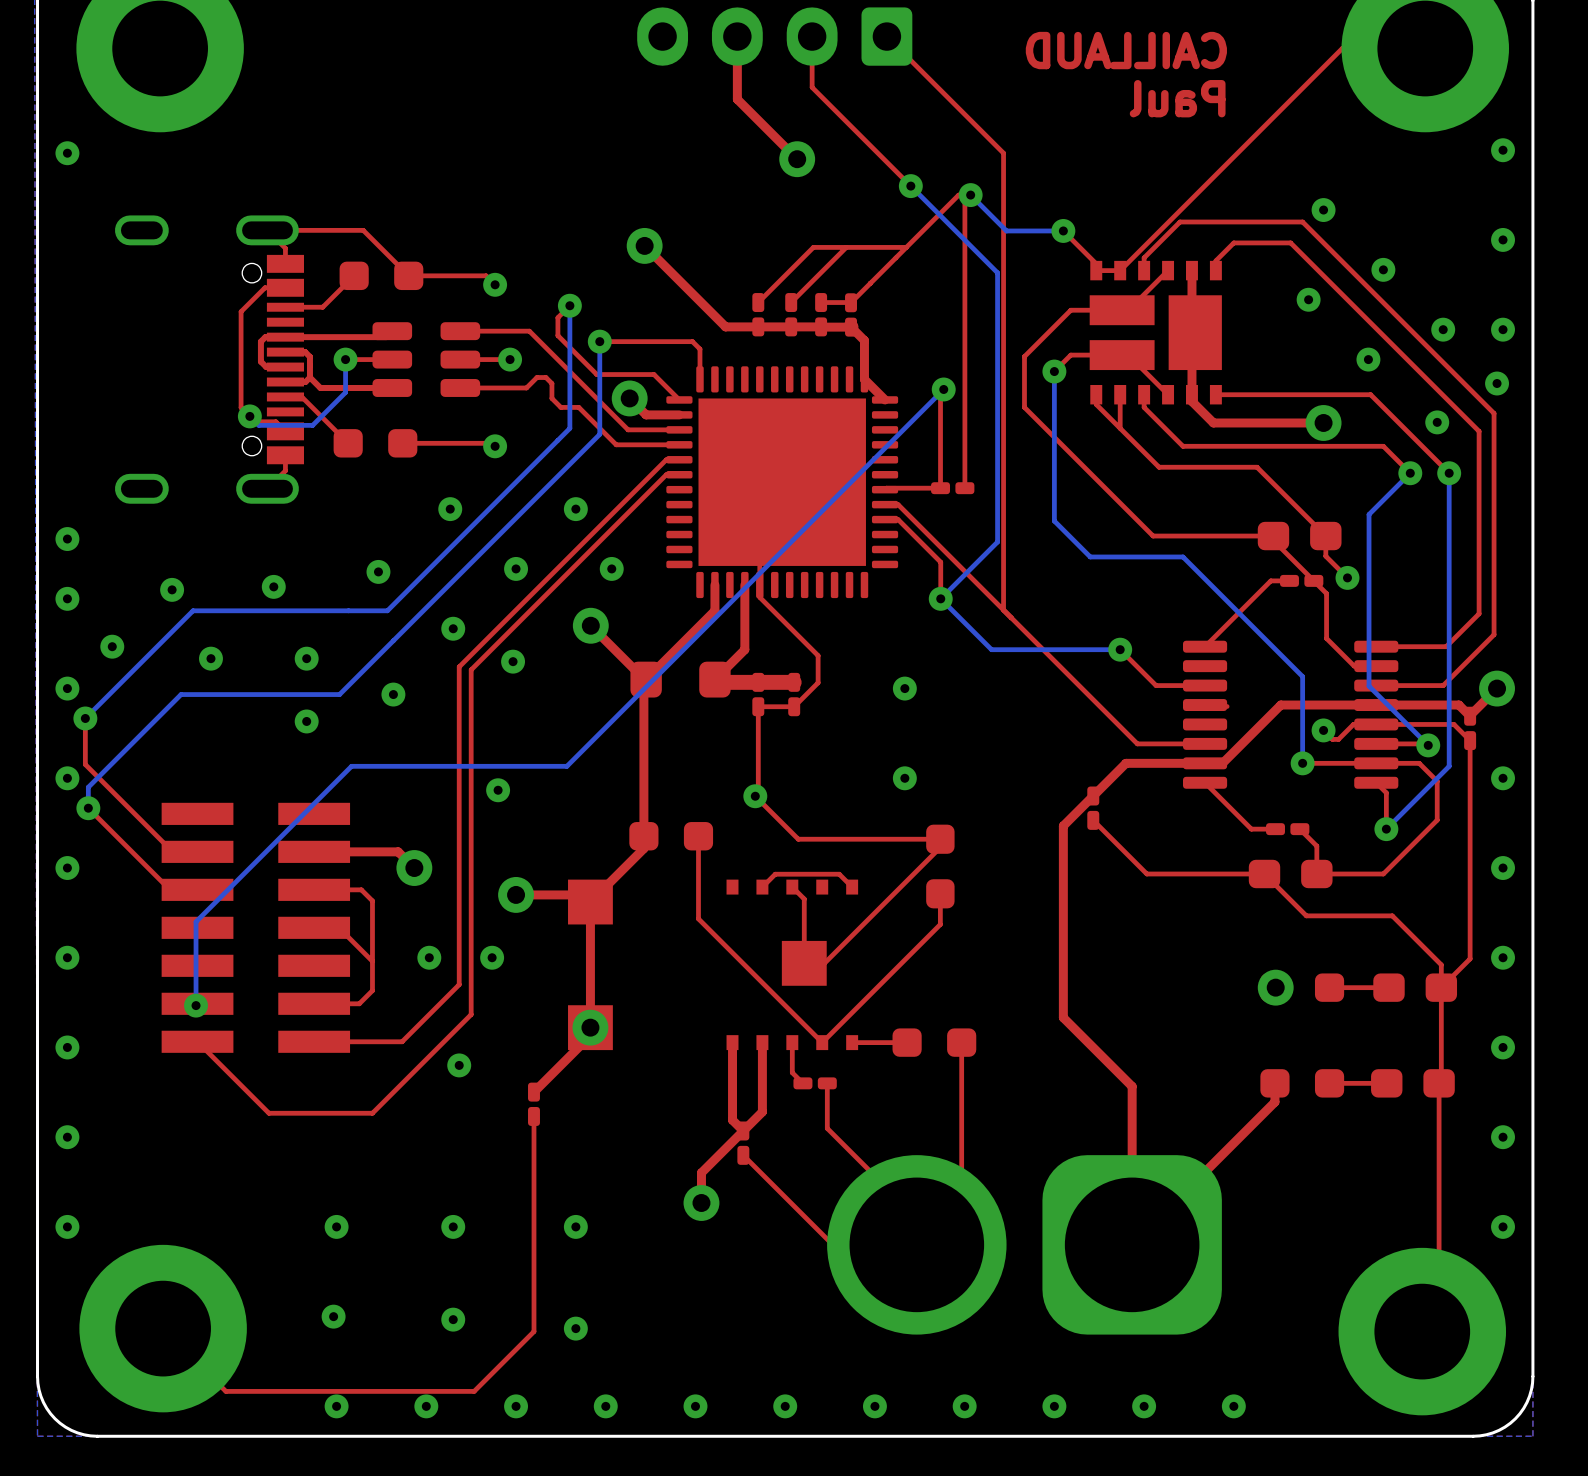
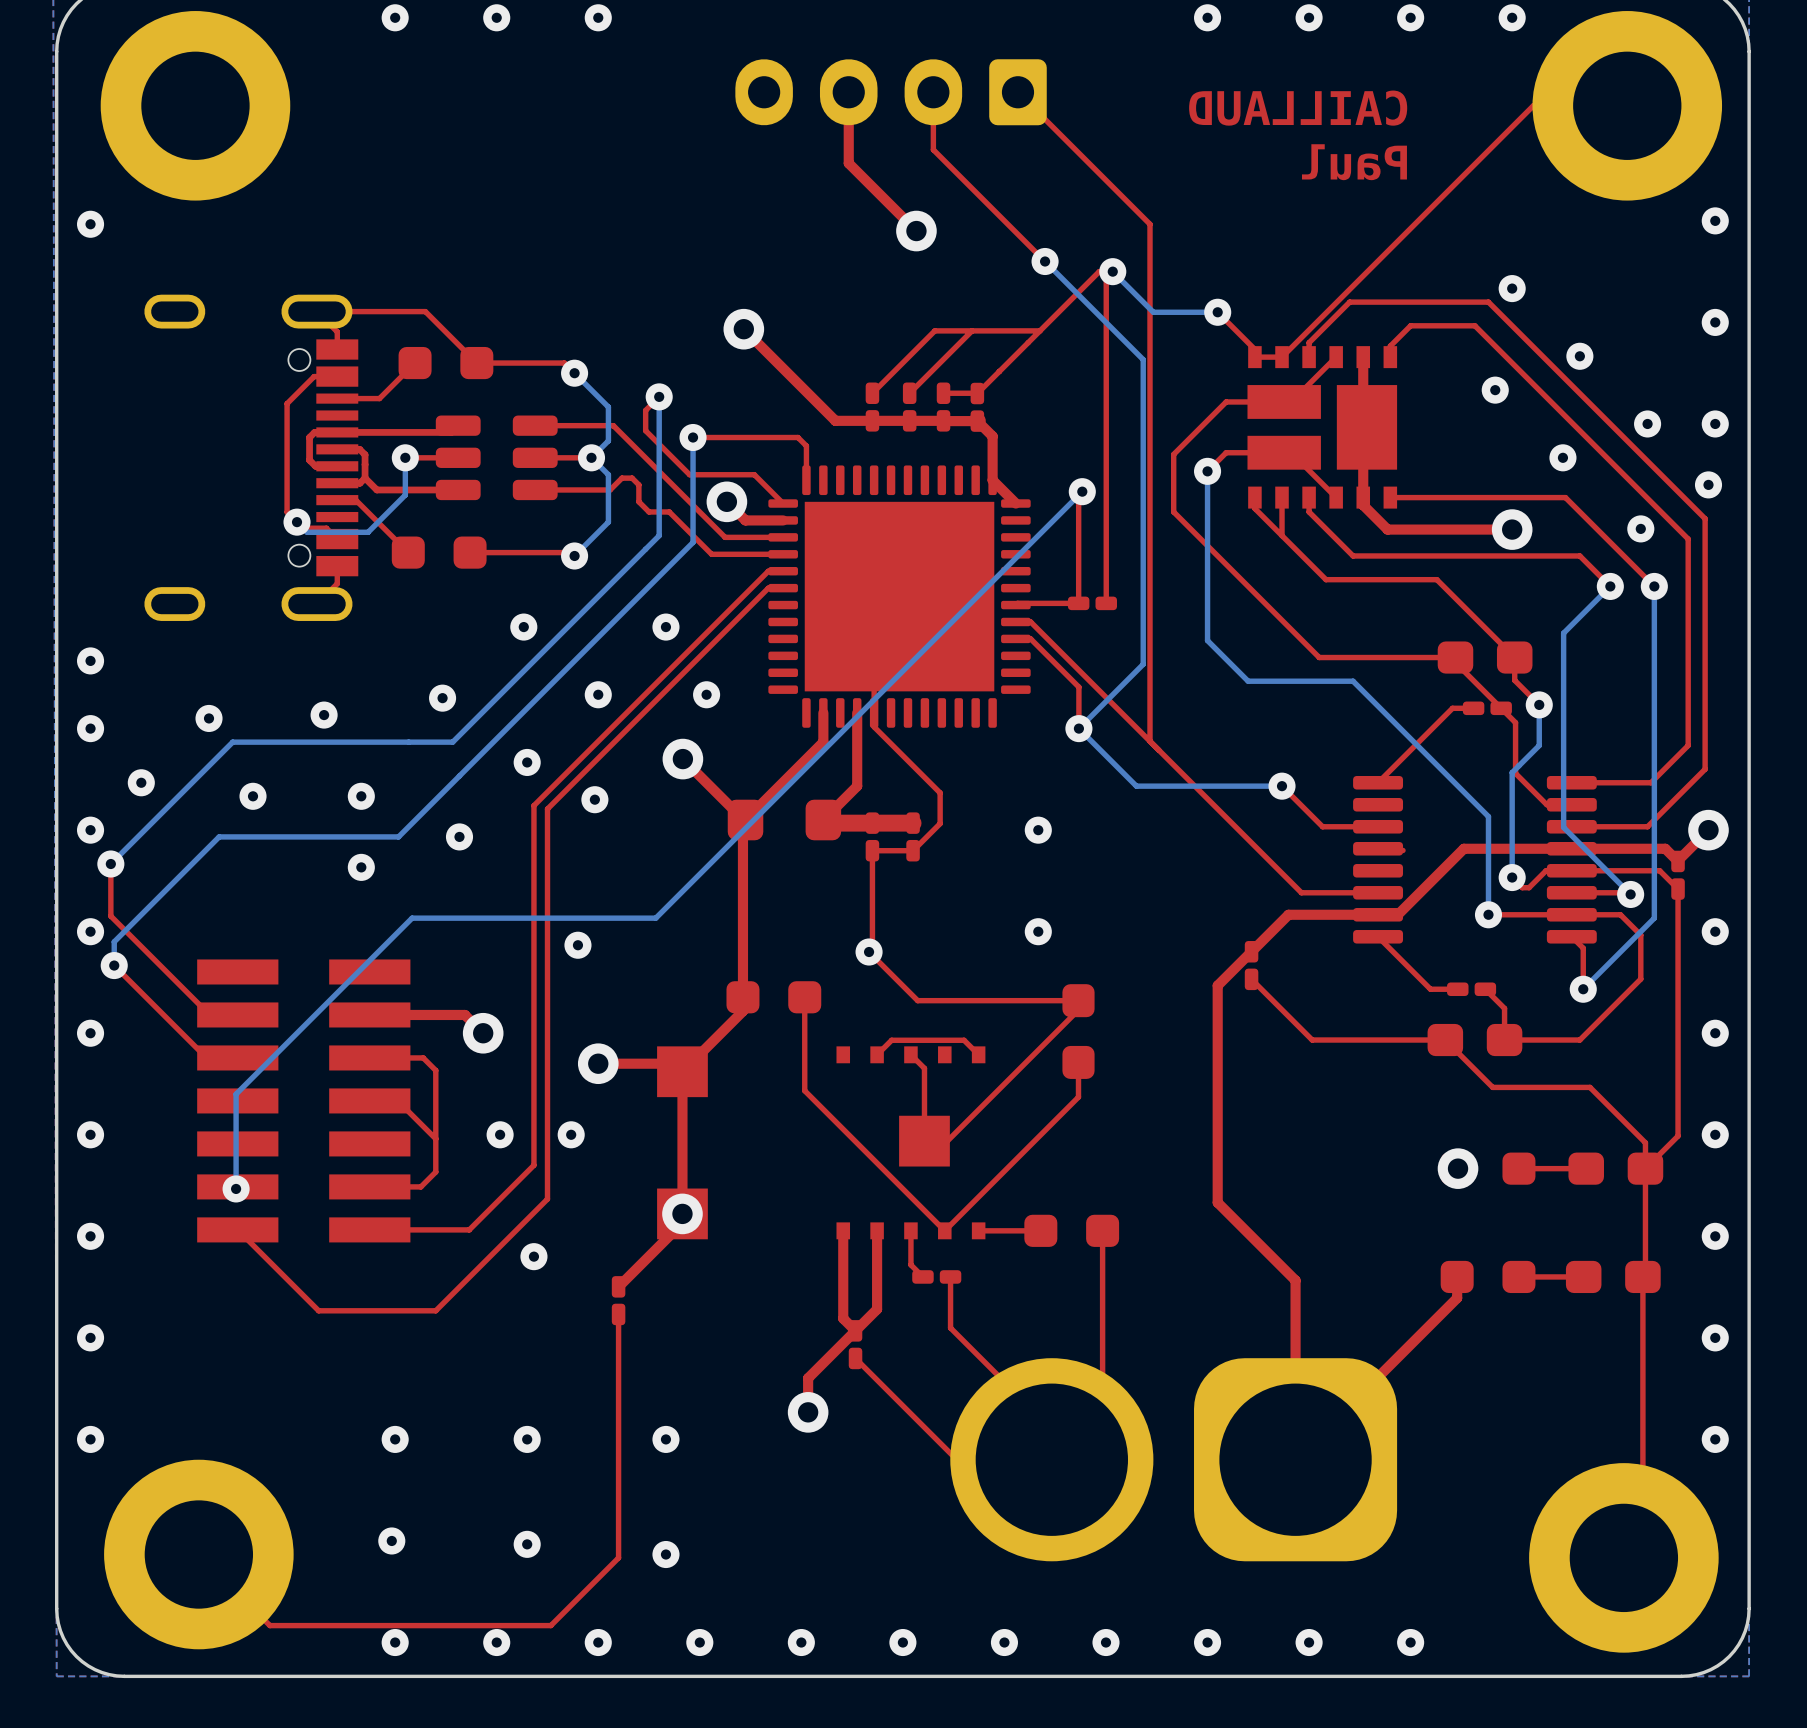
bottom track: none -> (574, 373) (608, 407) (608, 440) (591, 457) (608, 474) (608, 522) (574, 555)
bottom track: none -> (1539, 704) (1539, 745) (1512, 772) (1512, 877)

